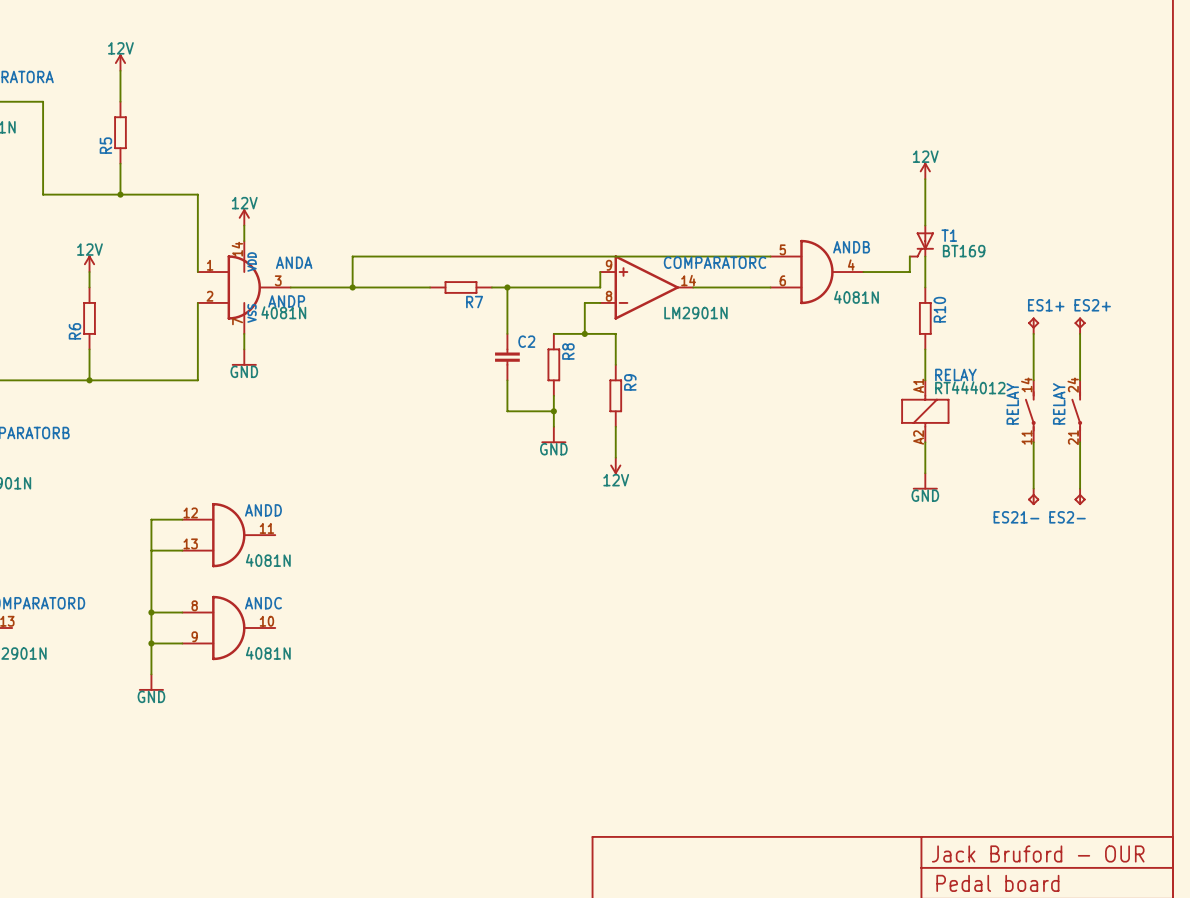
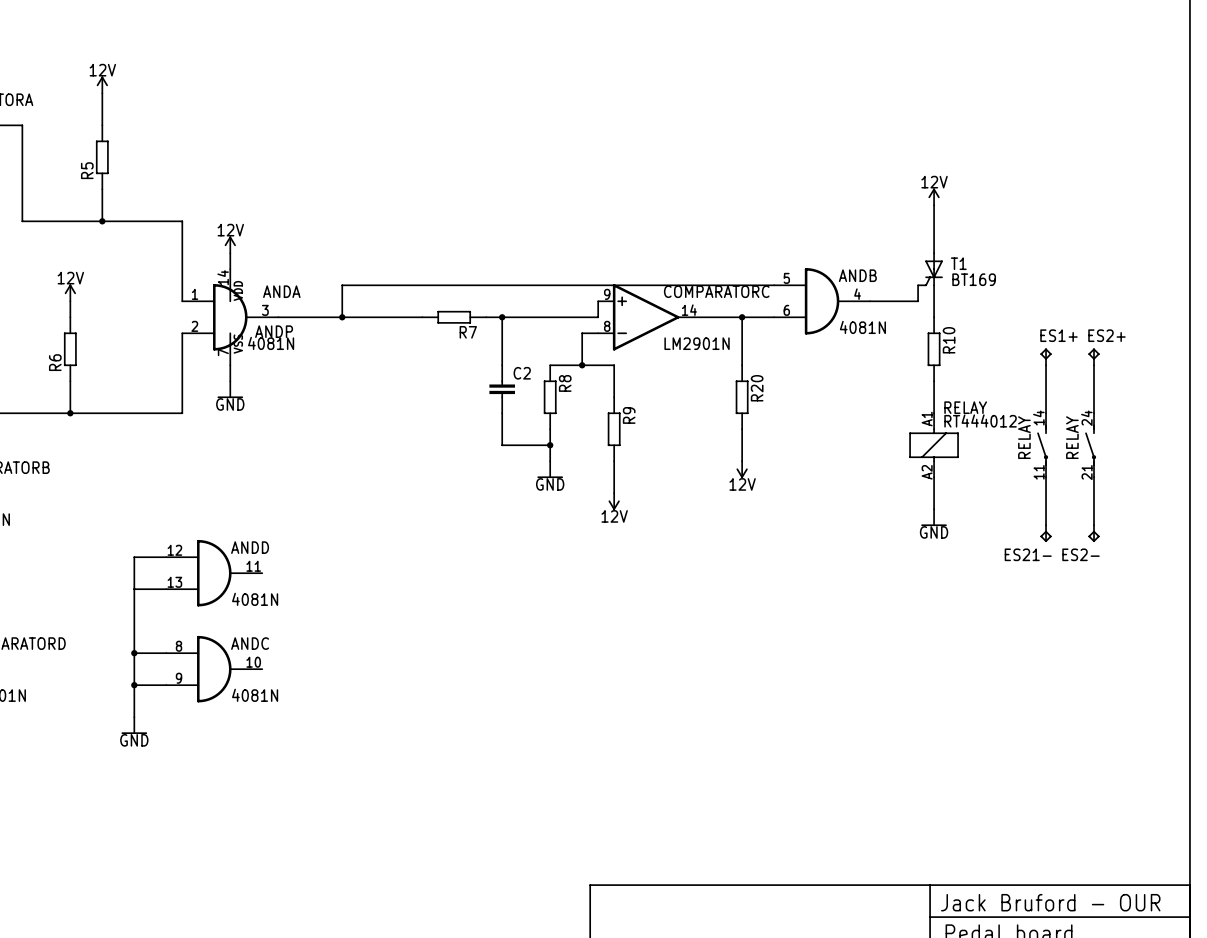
wire: none -> (742, 317) (742, 365)
junction: none -> (742, 317)
R20: none -> (742, 397)
wire: none -> (742, 429) (742, 461)
power symbol: none -> 12V (742, 469)

